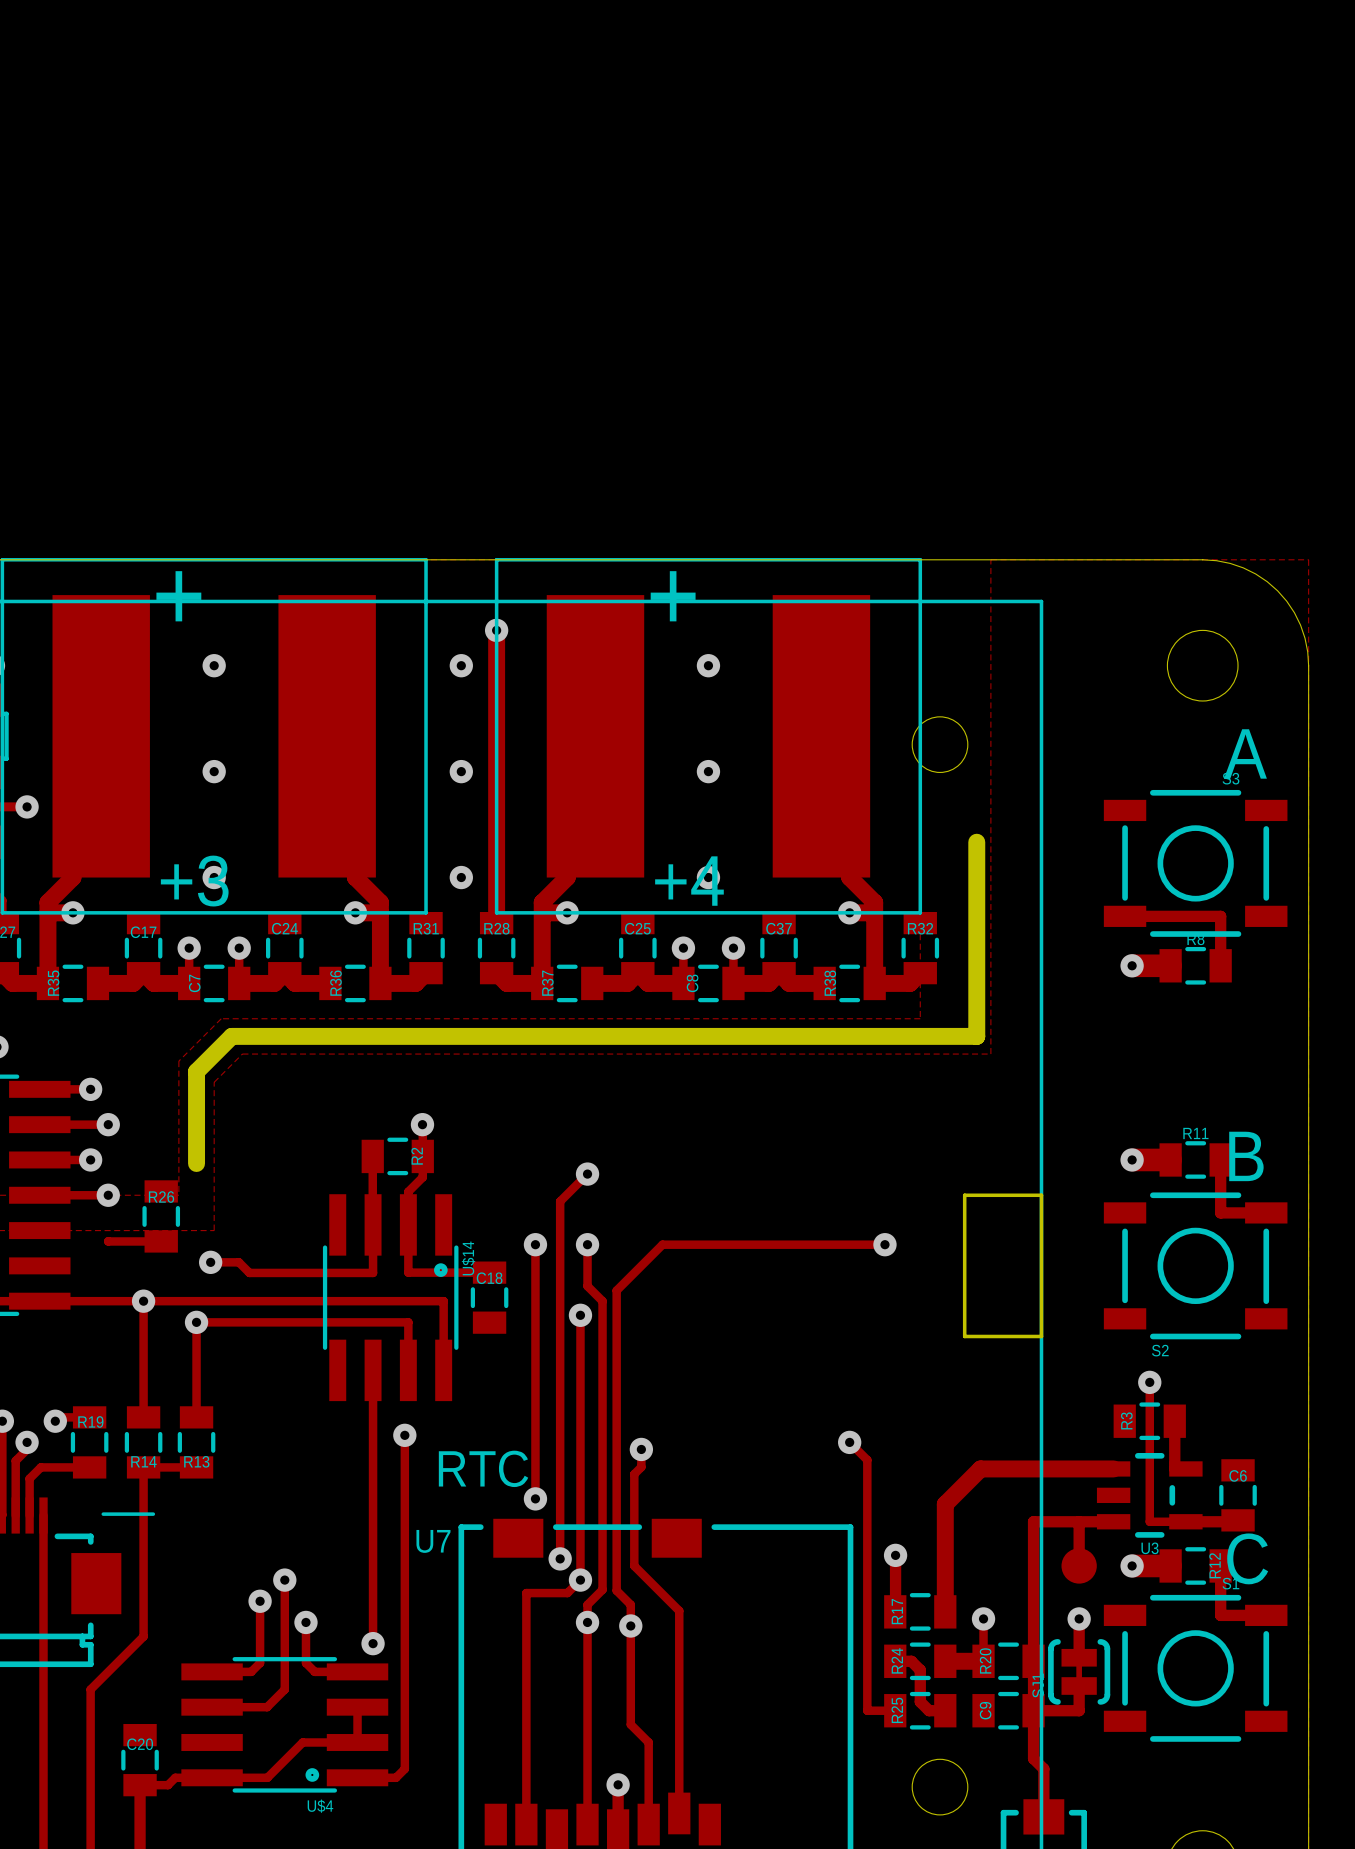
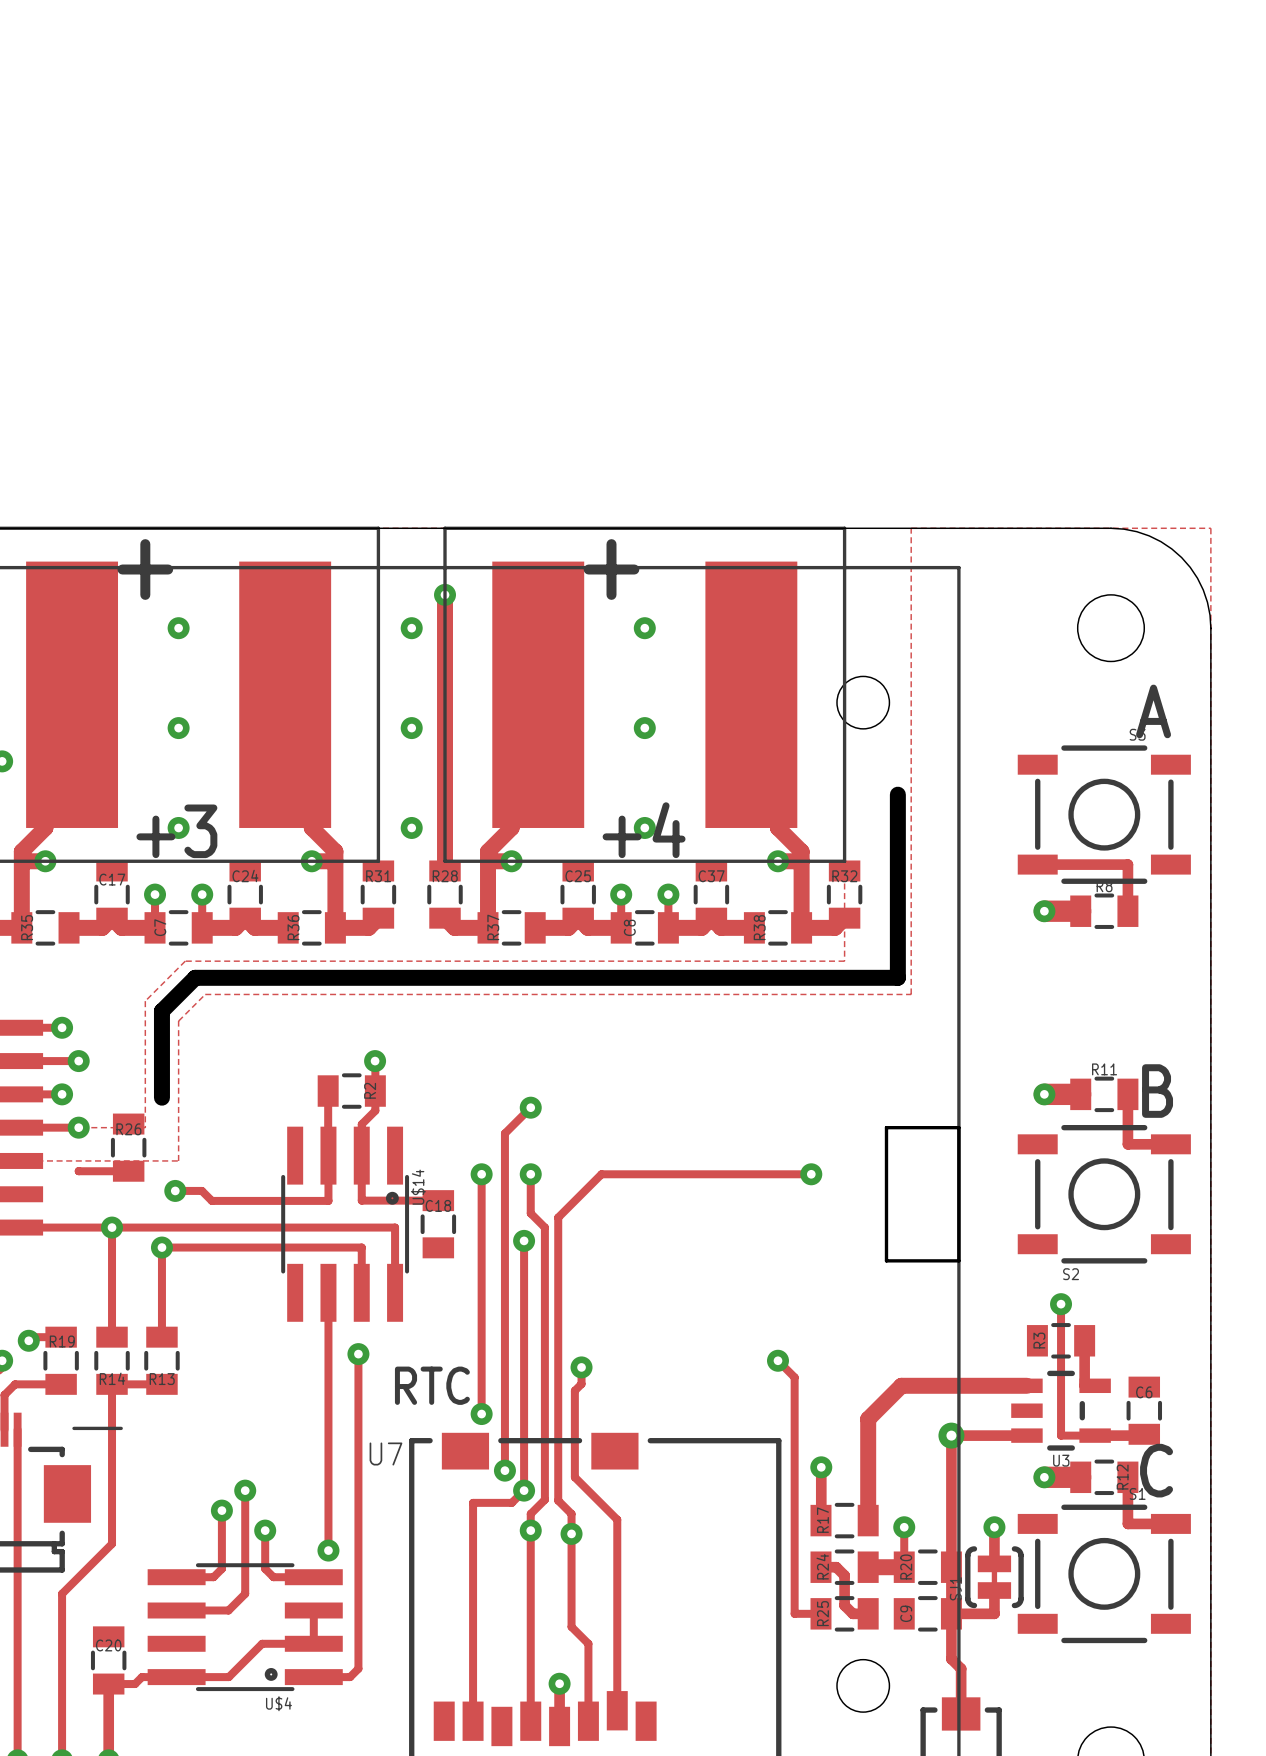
part: none -> (951, 1435)
track: (1079, 1521) (1079, 1565) -> none
part: (1079, 1565) -> none

